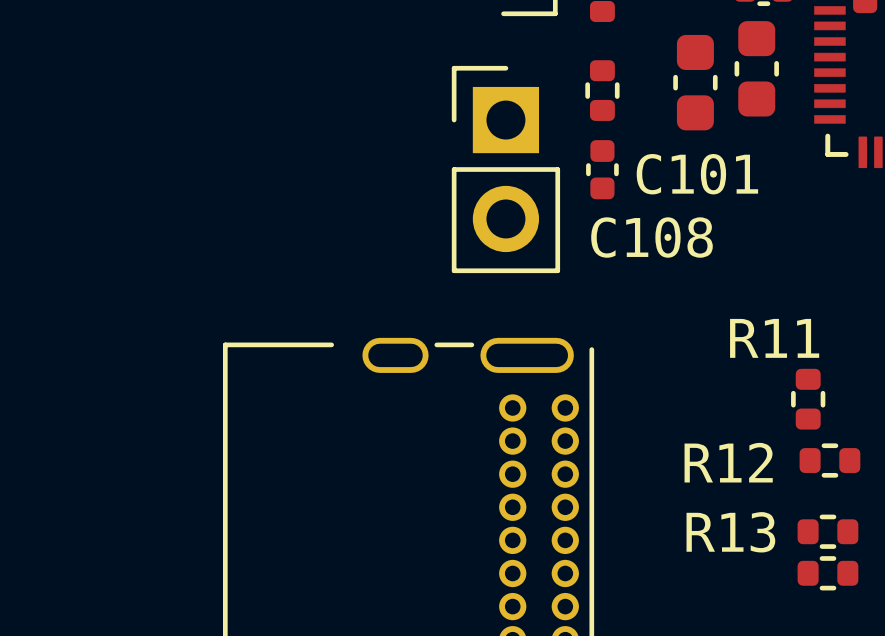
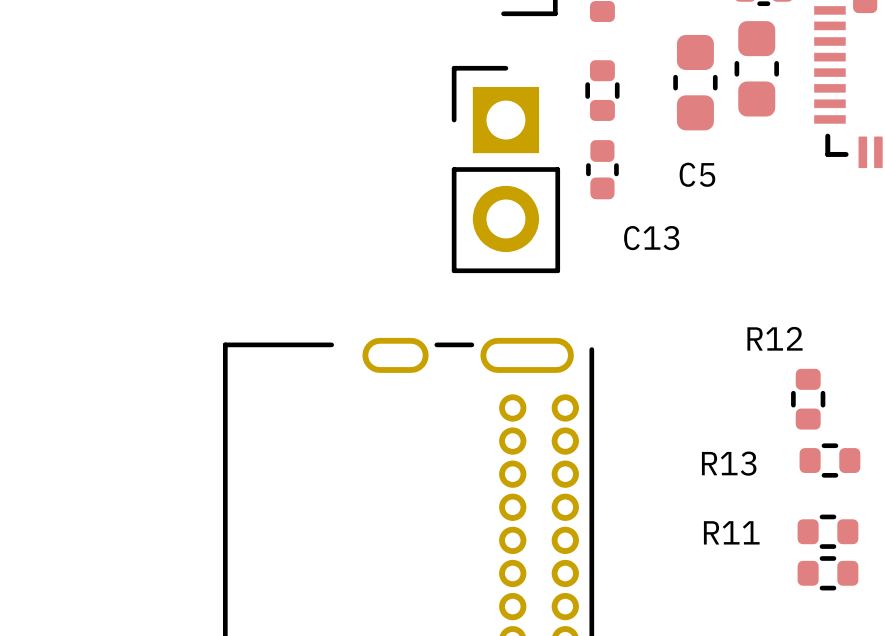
C101 name: C101 (697, 174) -> C5 (697, 174)
C108 name: C108 (652, 237) -> C13 (651, 238)
R11 name: R11 (774, 338) -> R12 (775, 338)
R12 name: R12 (728, 462) -> R13 (729, 463)
R13 name: R13 (730, 532) -> R11 (731, 532)

